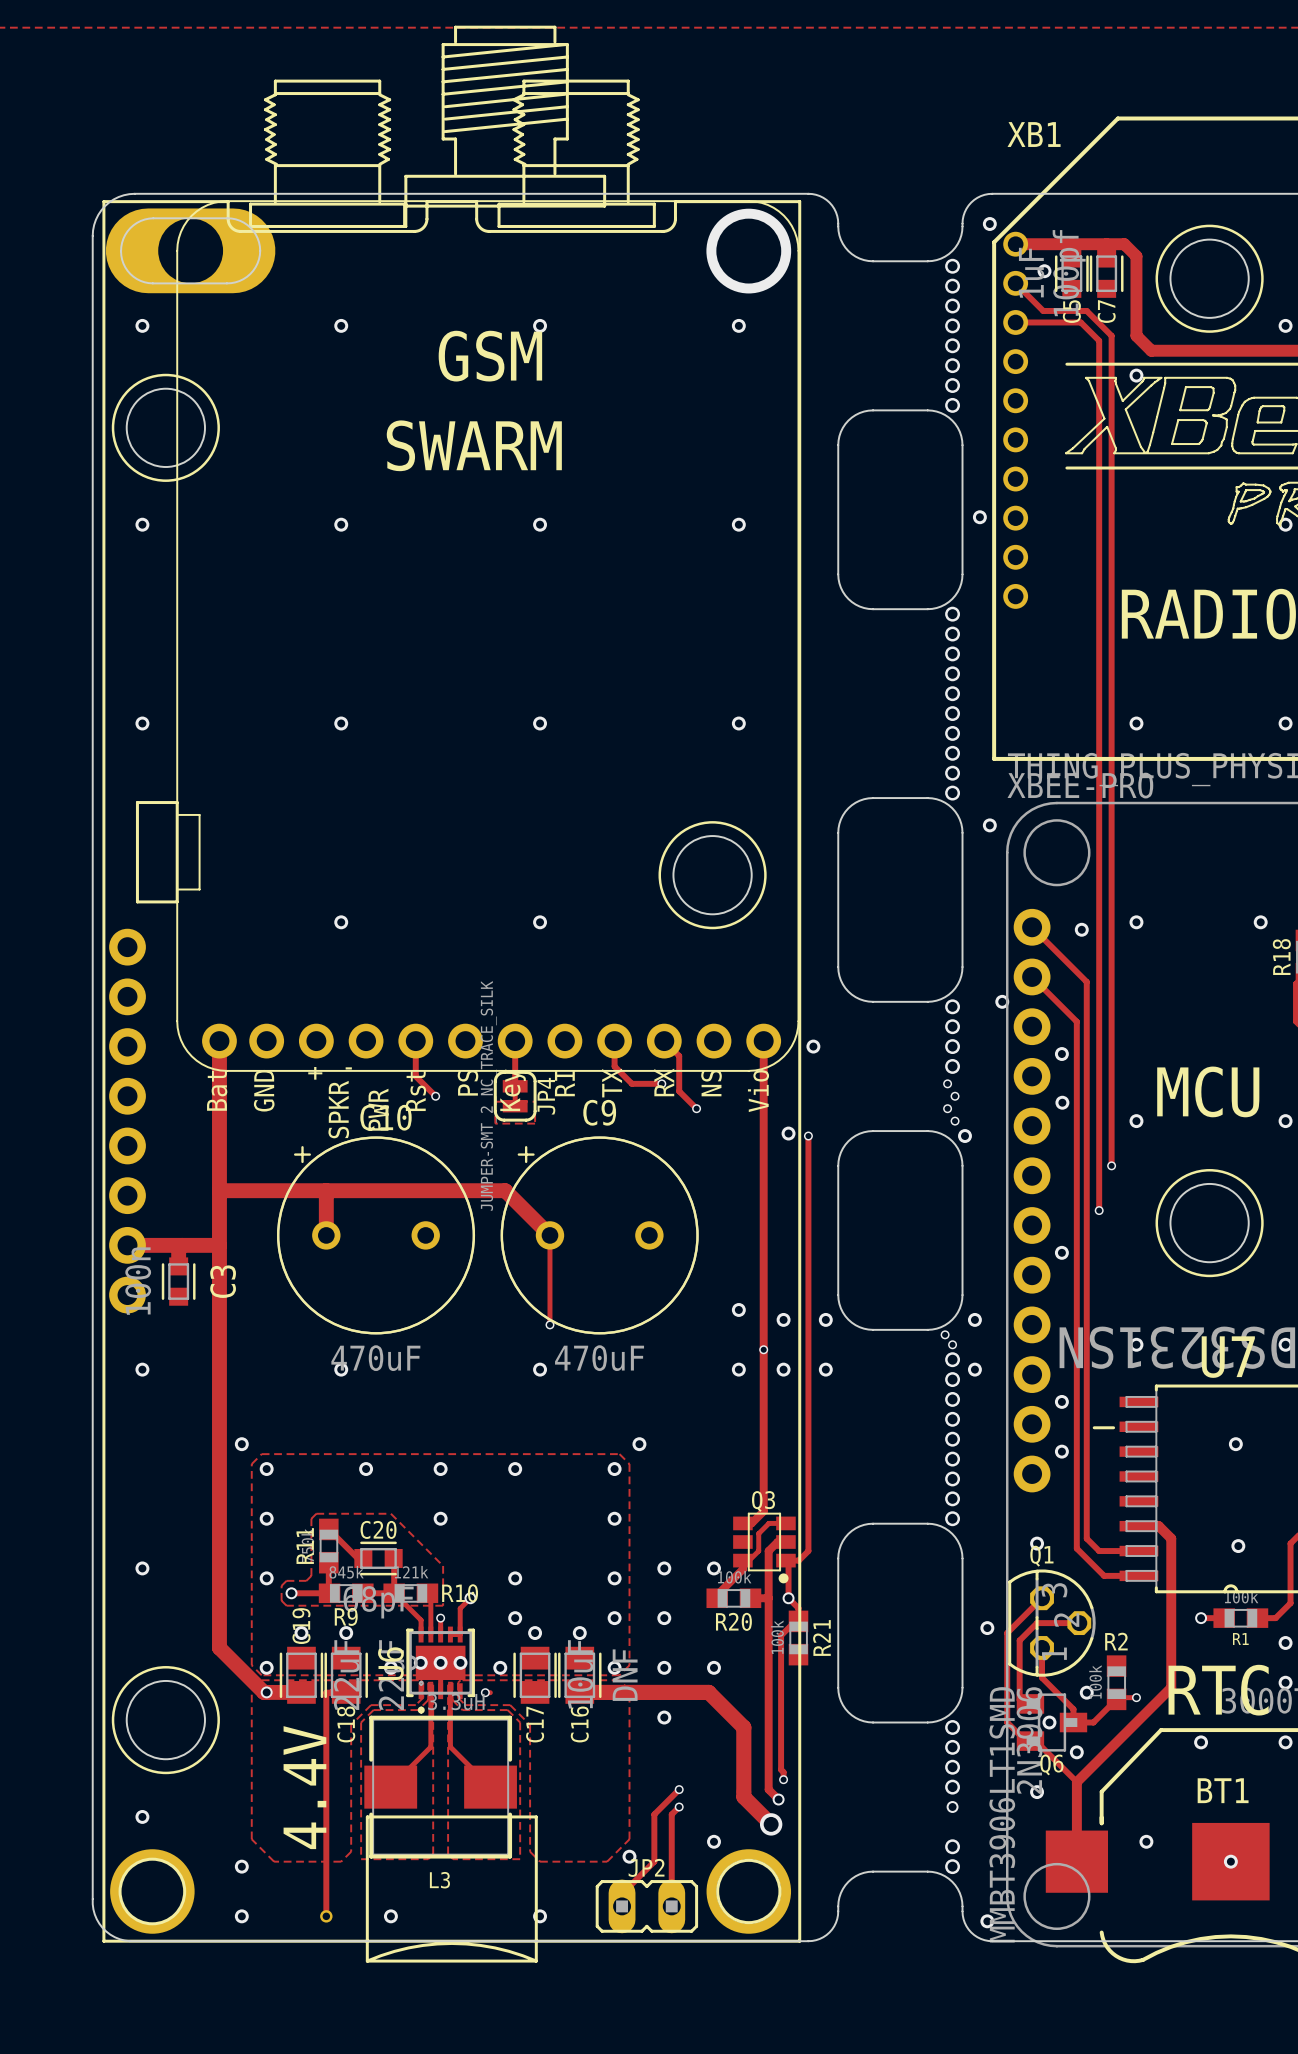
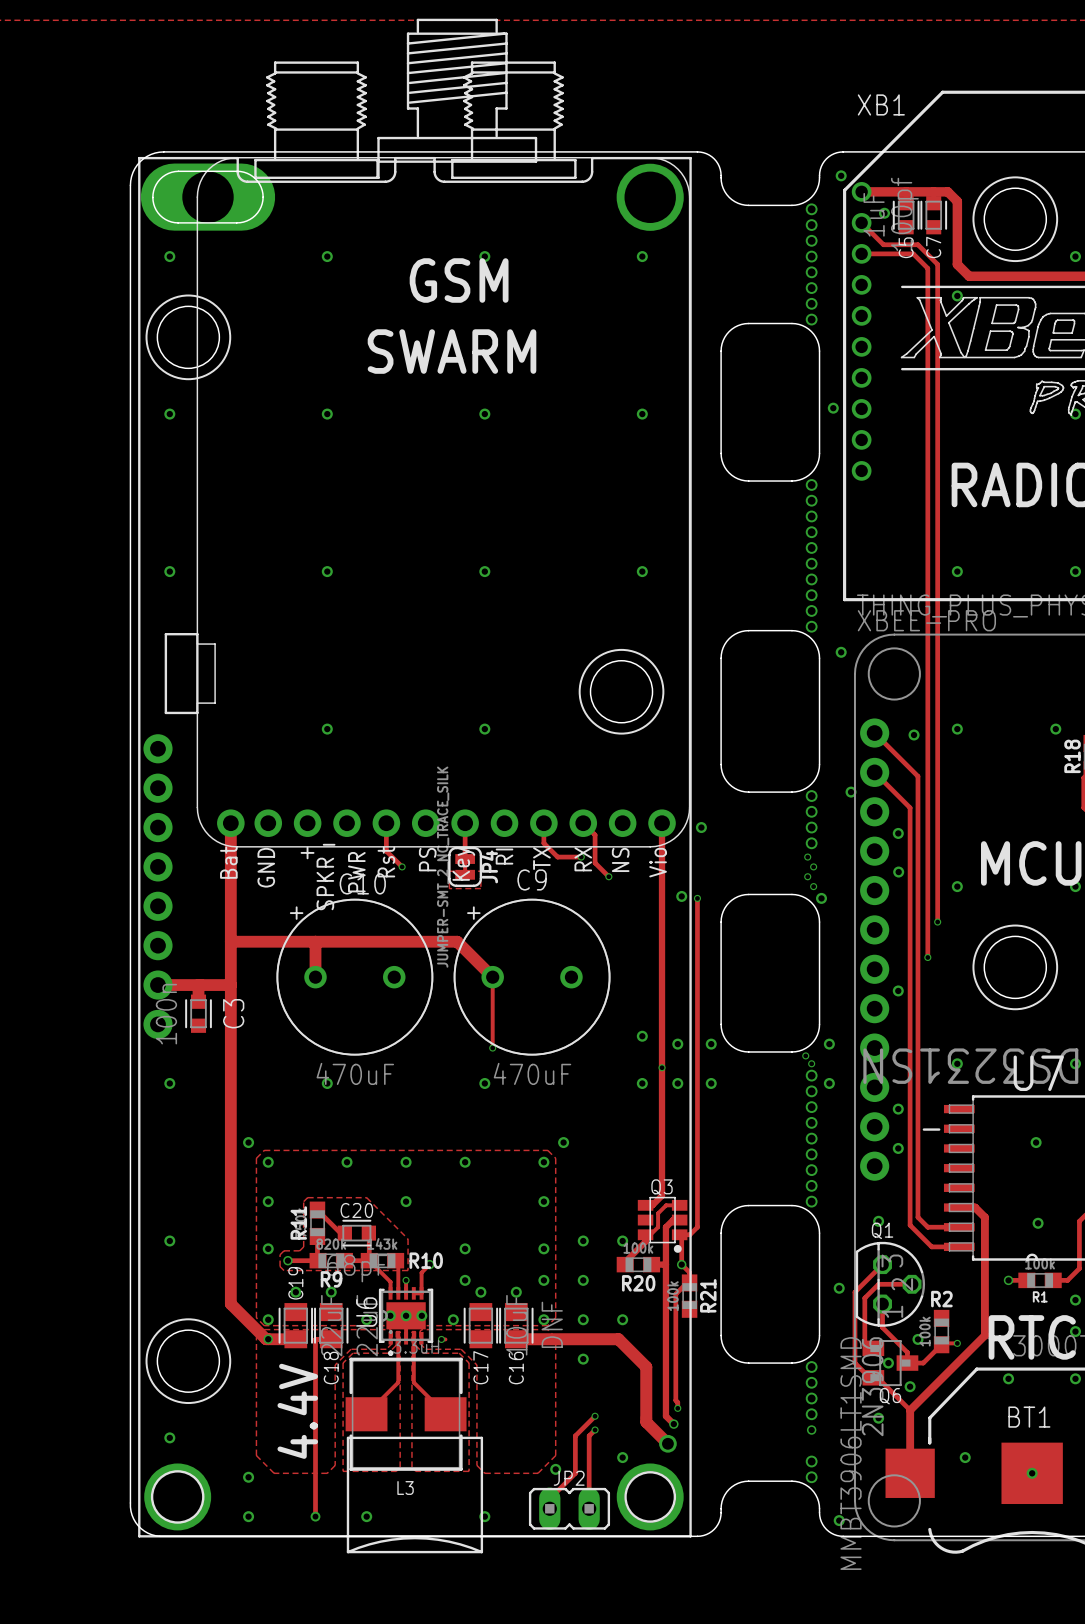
R9 value: 845k (346, 1572) -> 820k (331, 1244)
R10 value: 121k (411, 1572) -> 143k (382, 1243)

